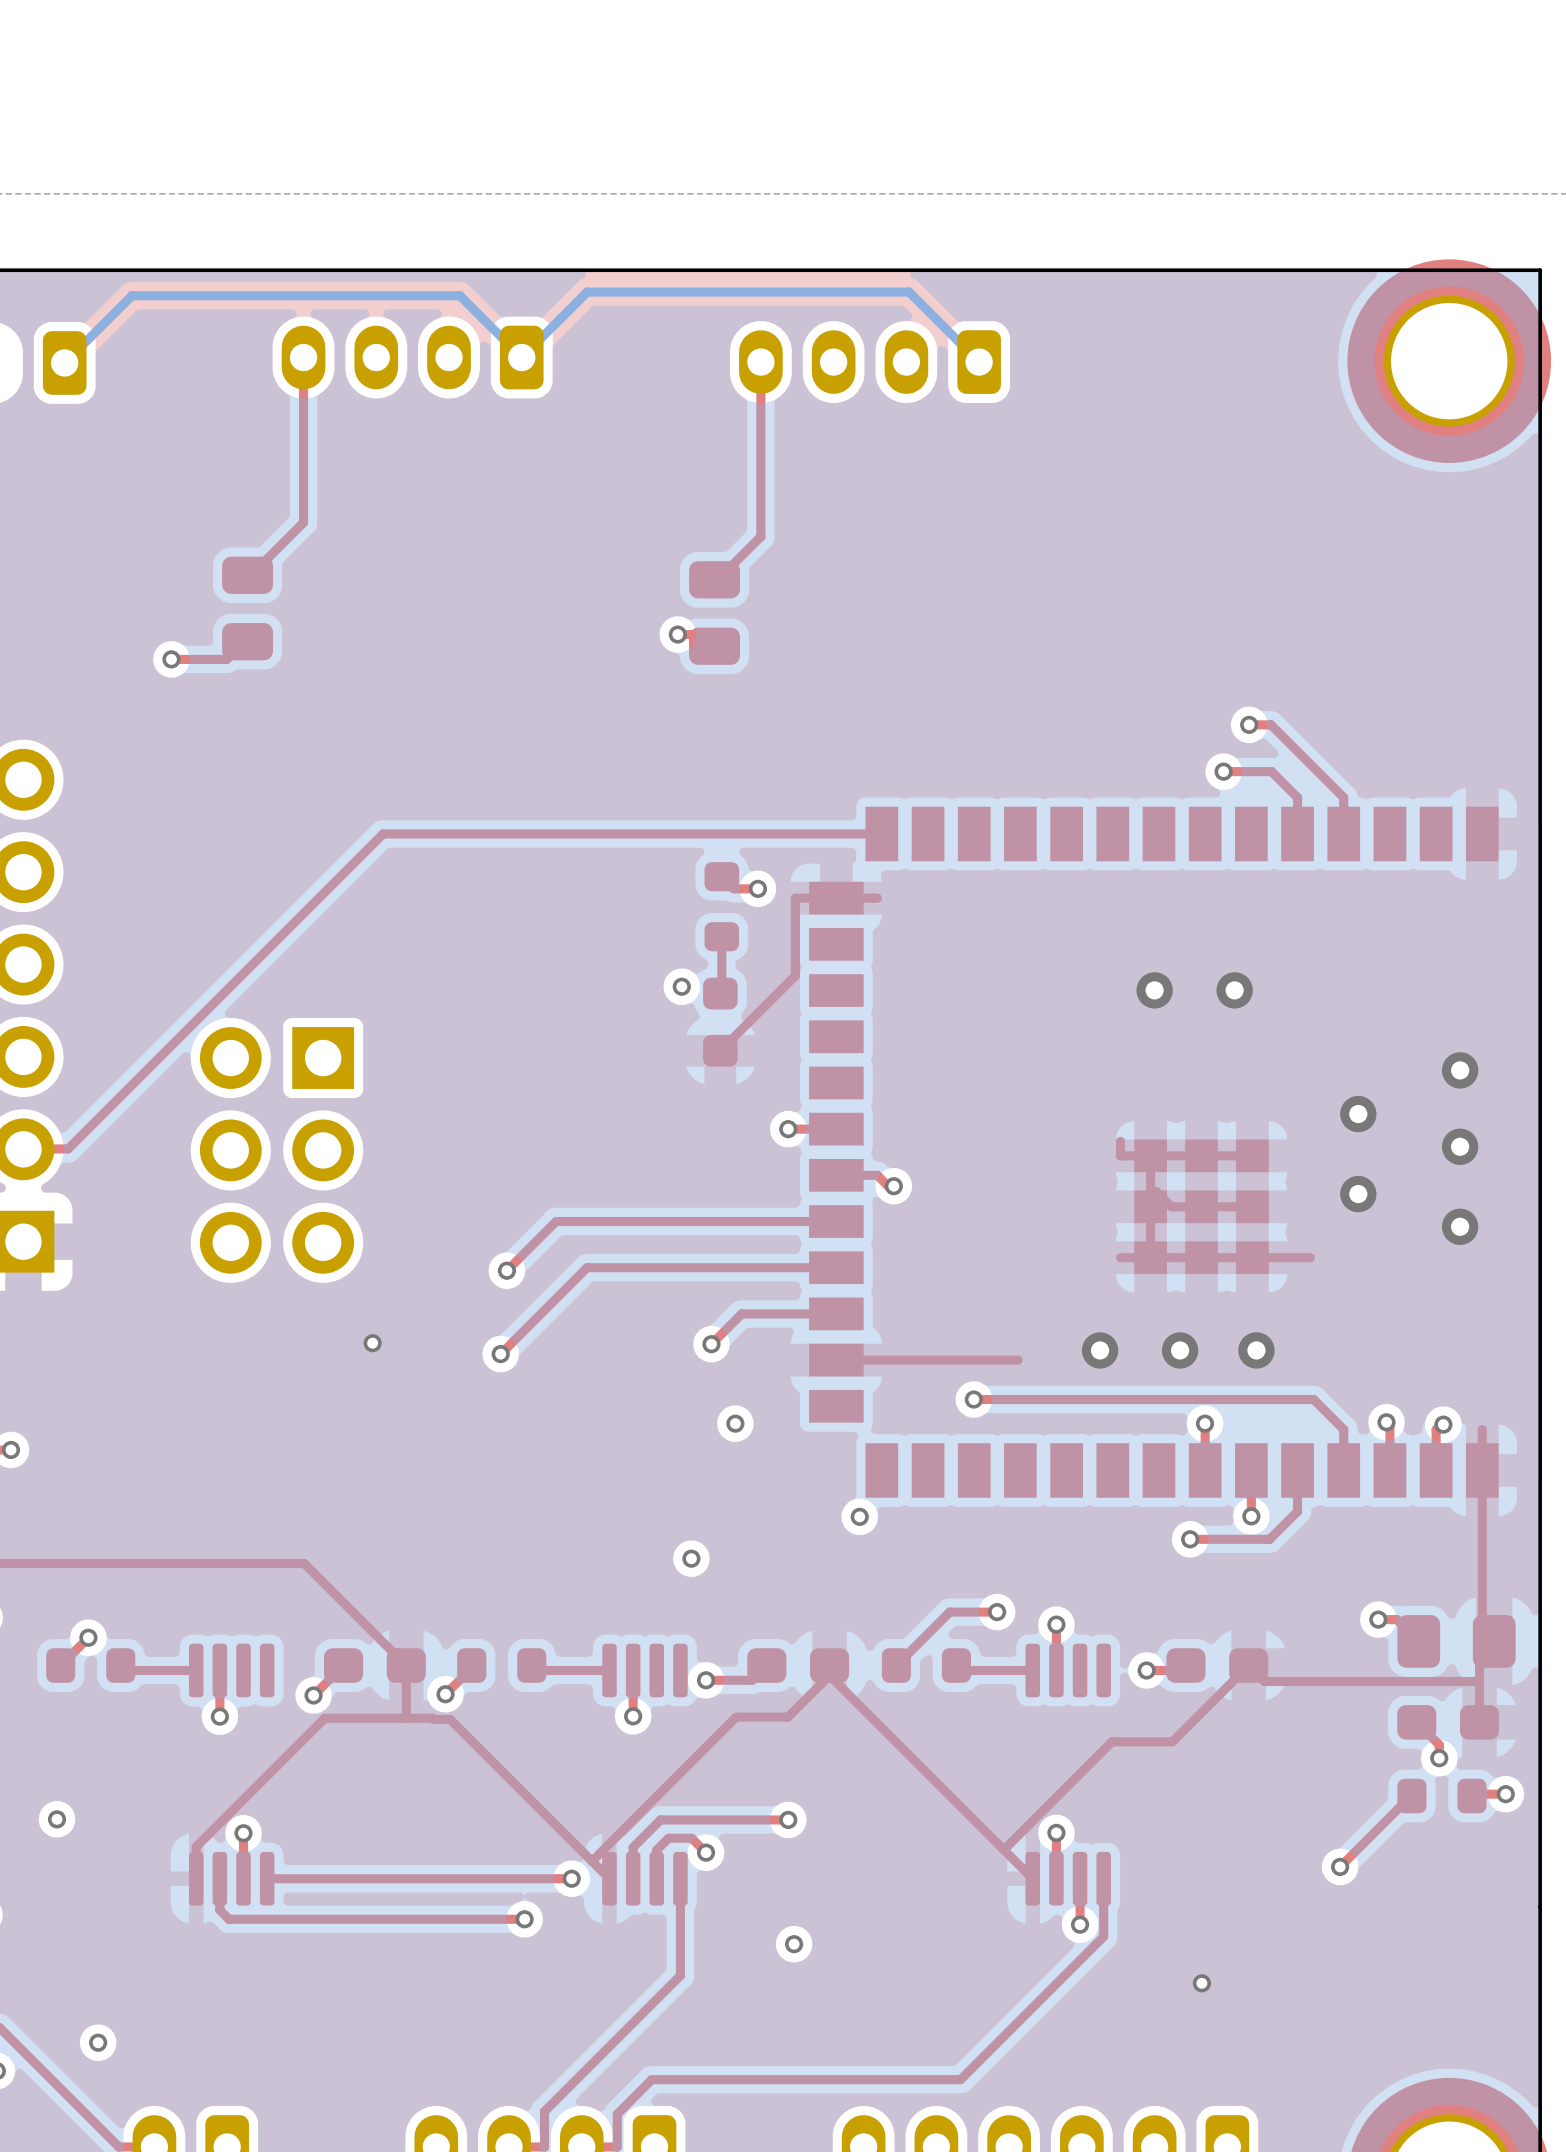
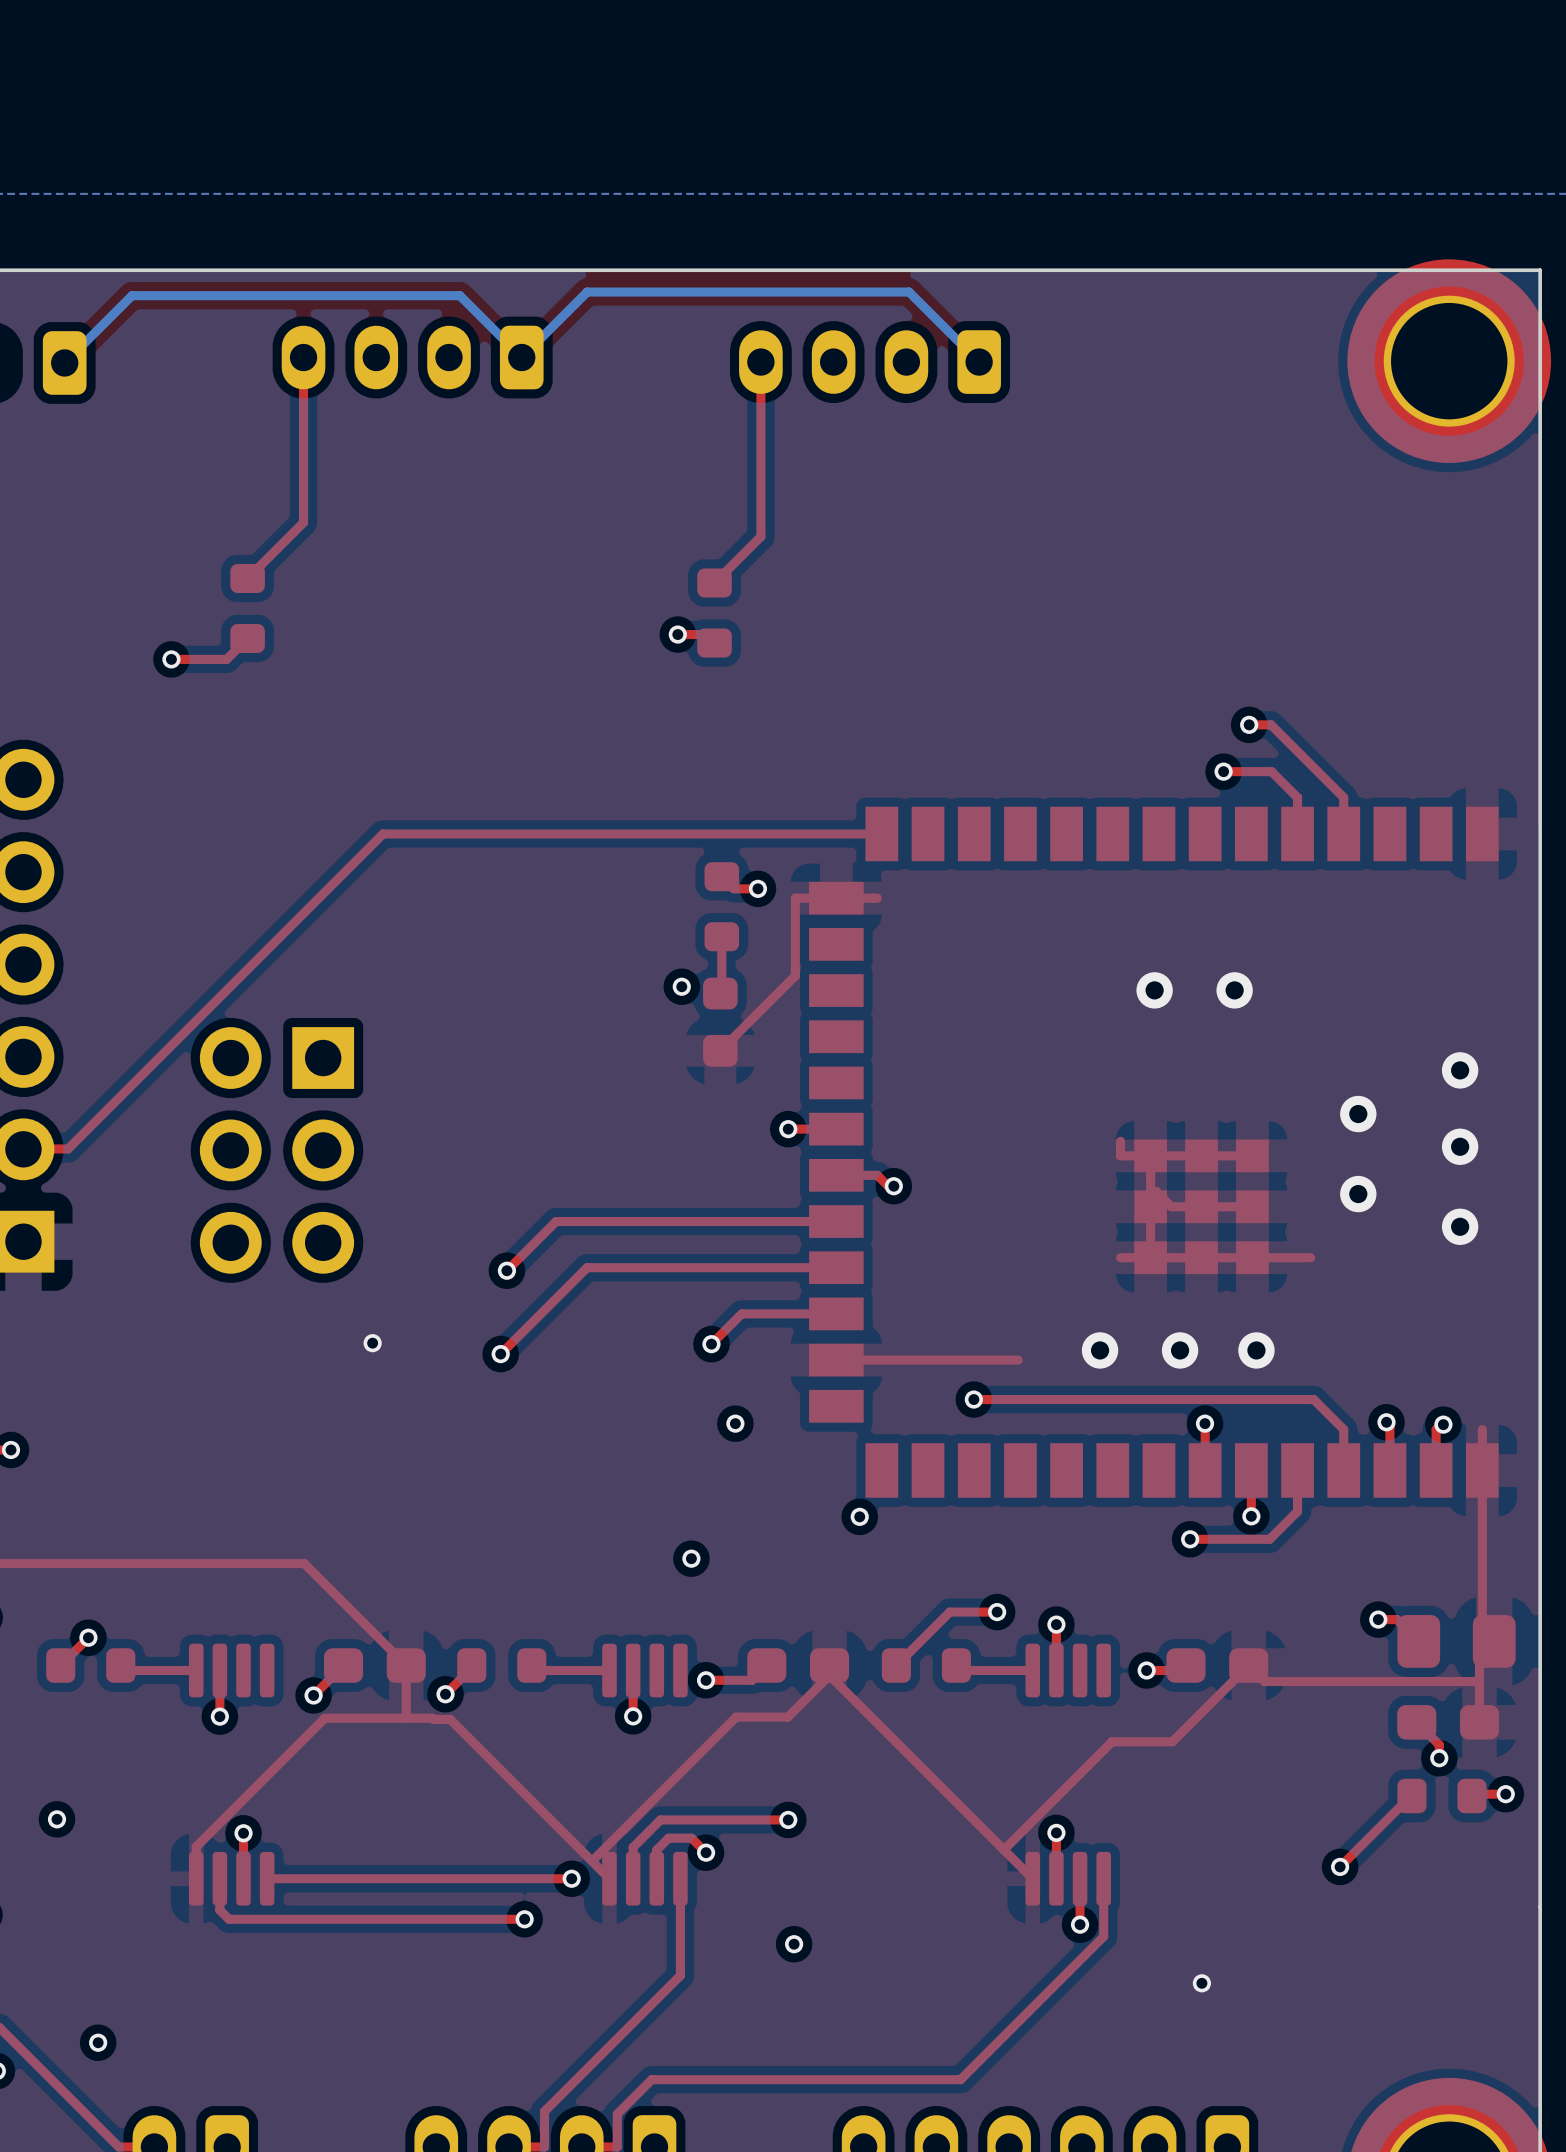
part footprint: [222, 556, 274, 661] -> [230, 563, 265, 654]
part footprint: [689, 561, 740, 665] -> [697, 568, 732, 658]

